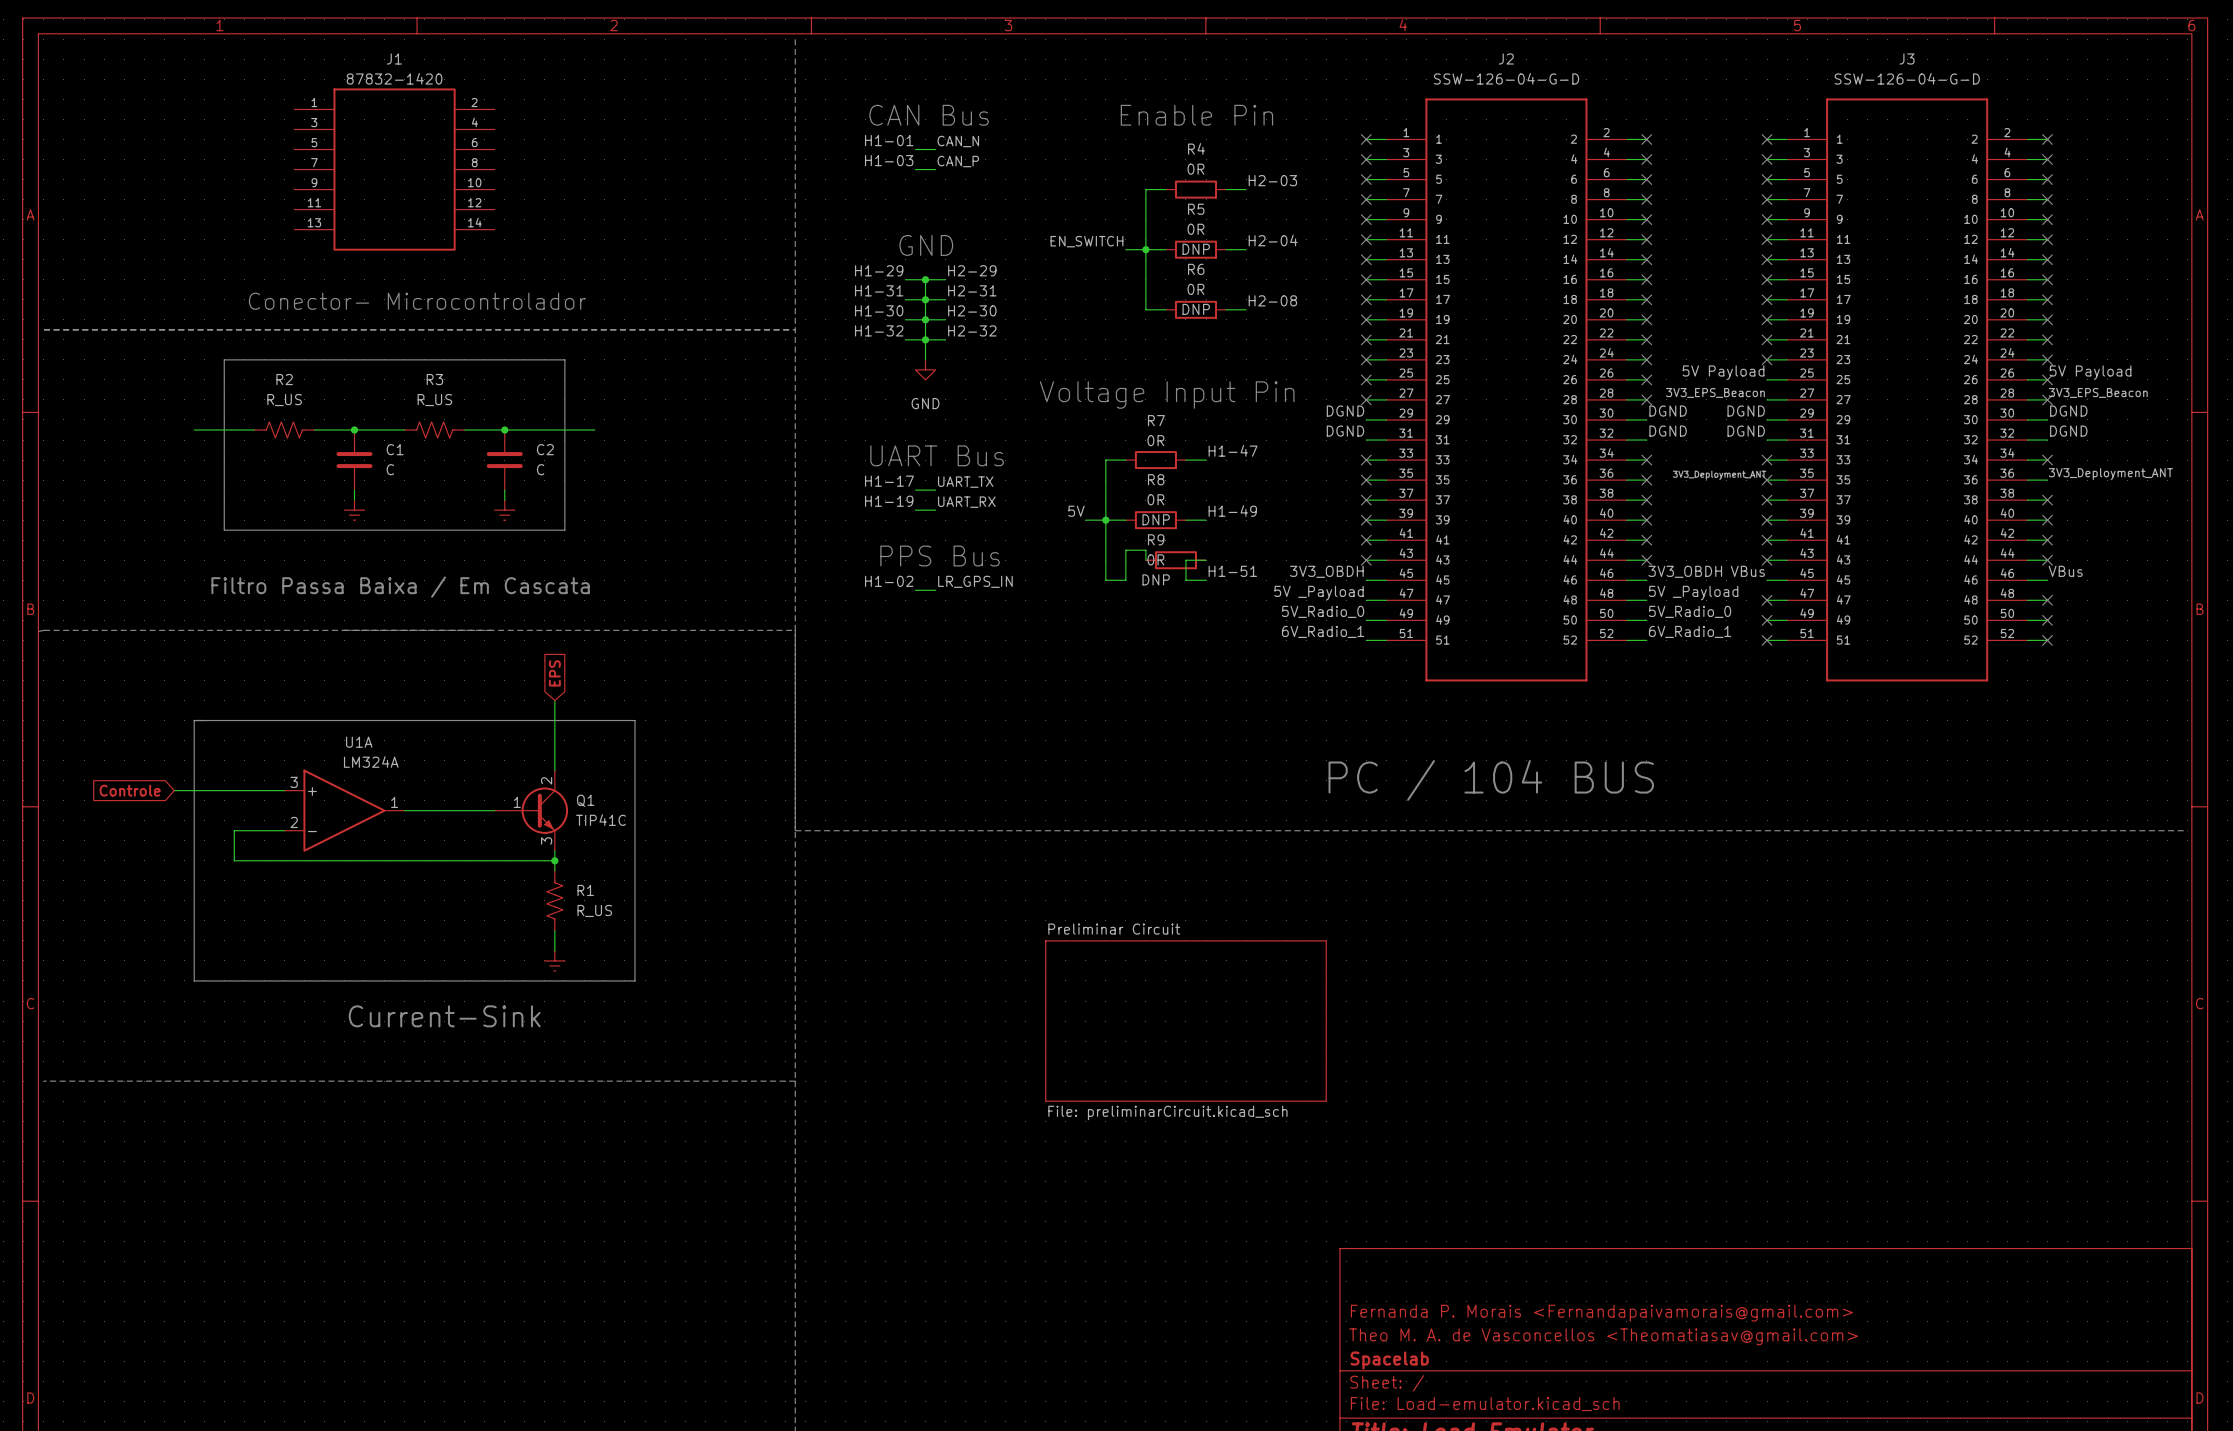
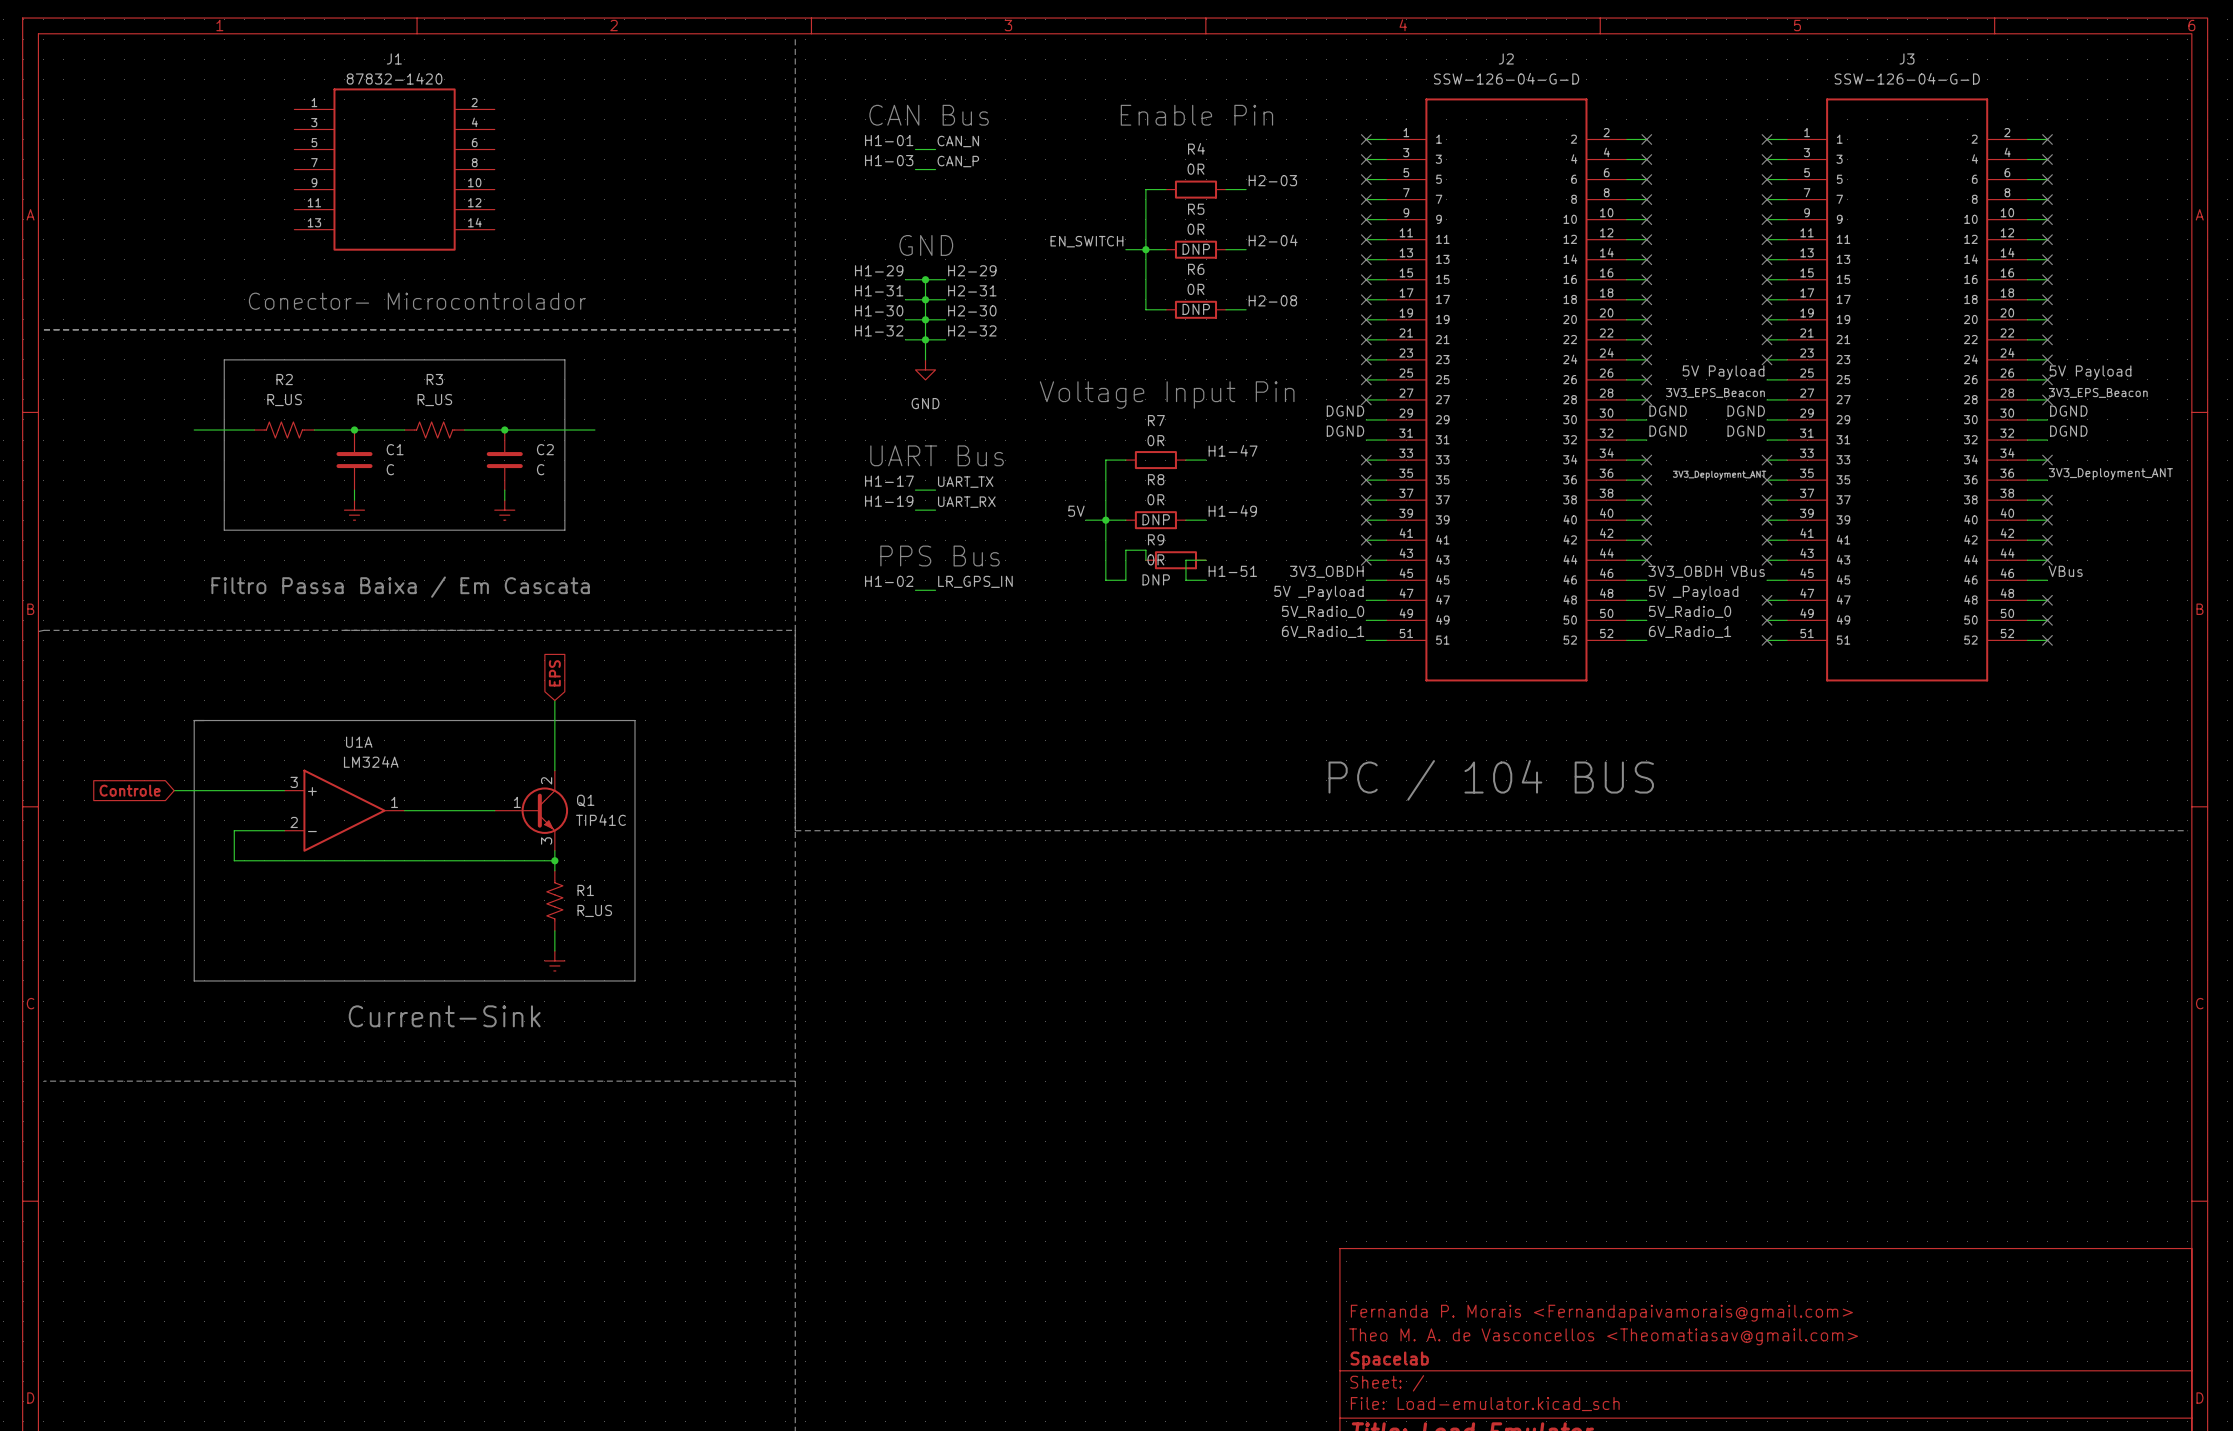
sheet Preliminar Circuit: File: preliminarCircuit.kicad_sch (1185, 1021) -> none

